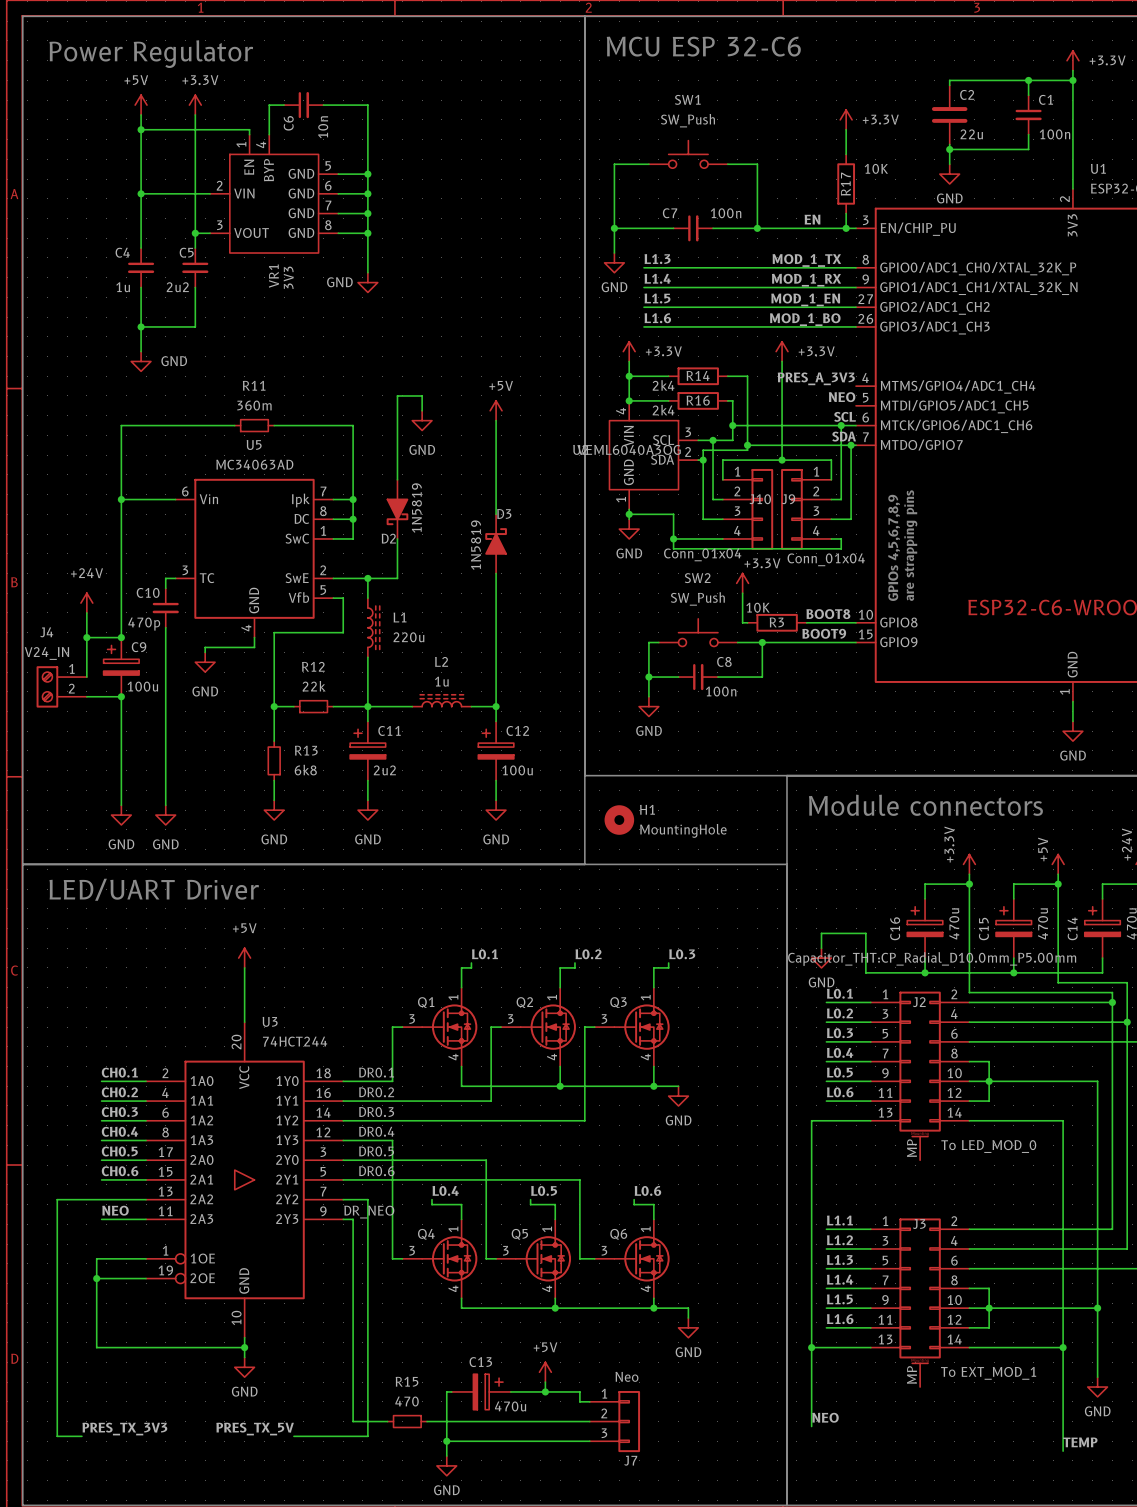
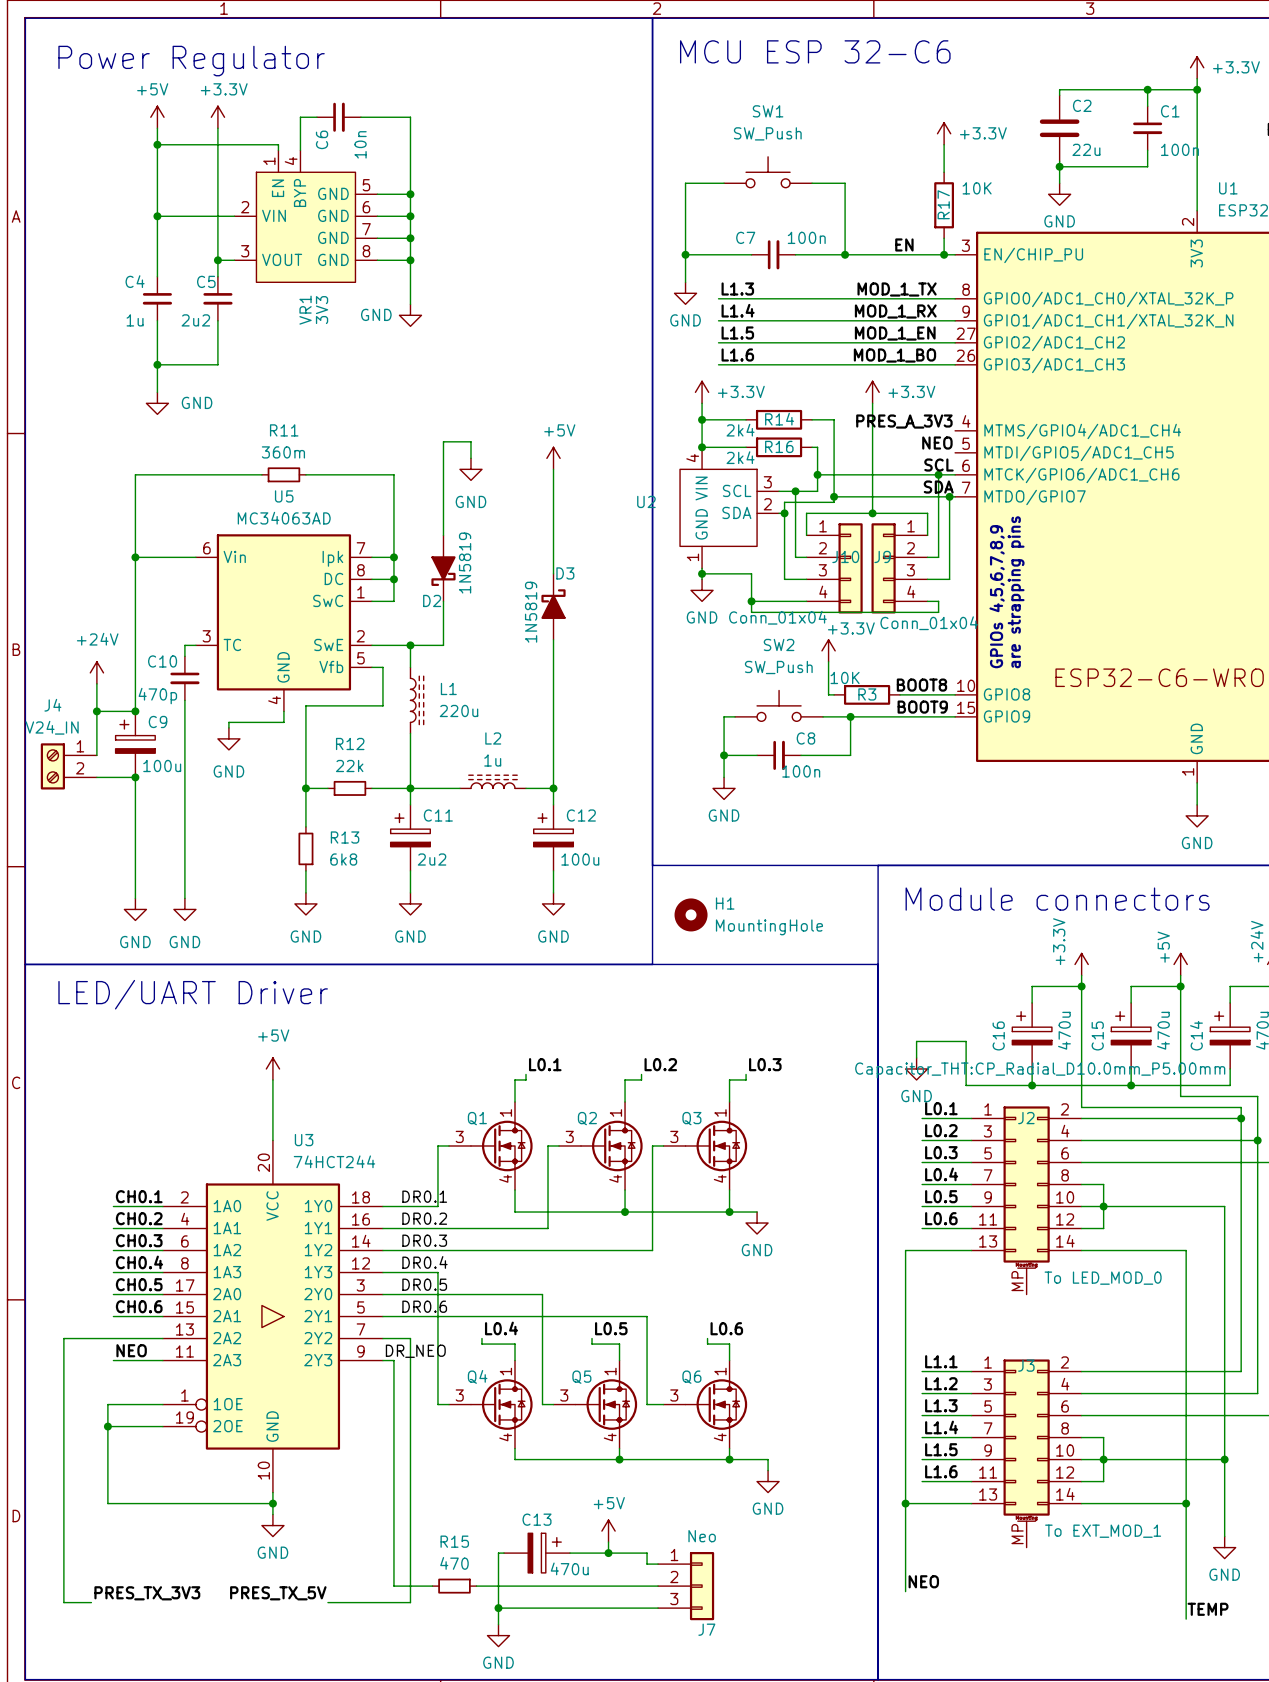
U2 value: VEML6040A3OG (629, 449) -> none

